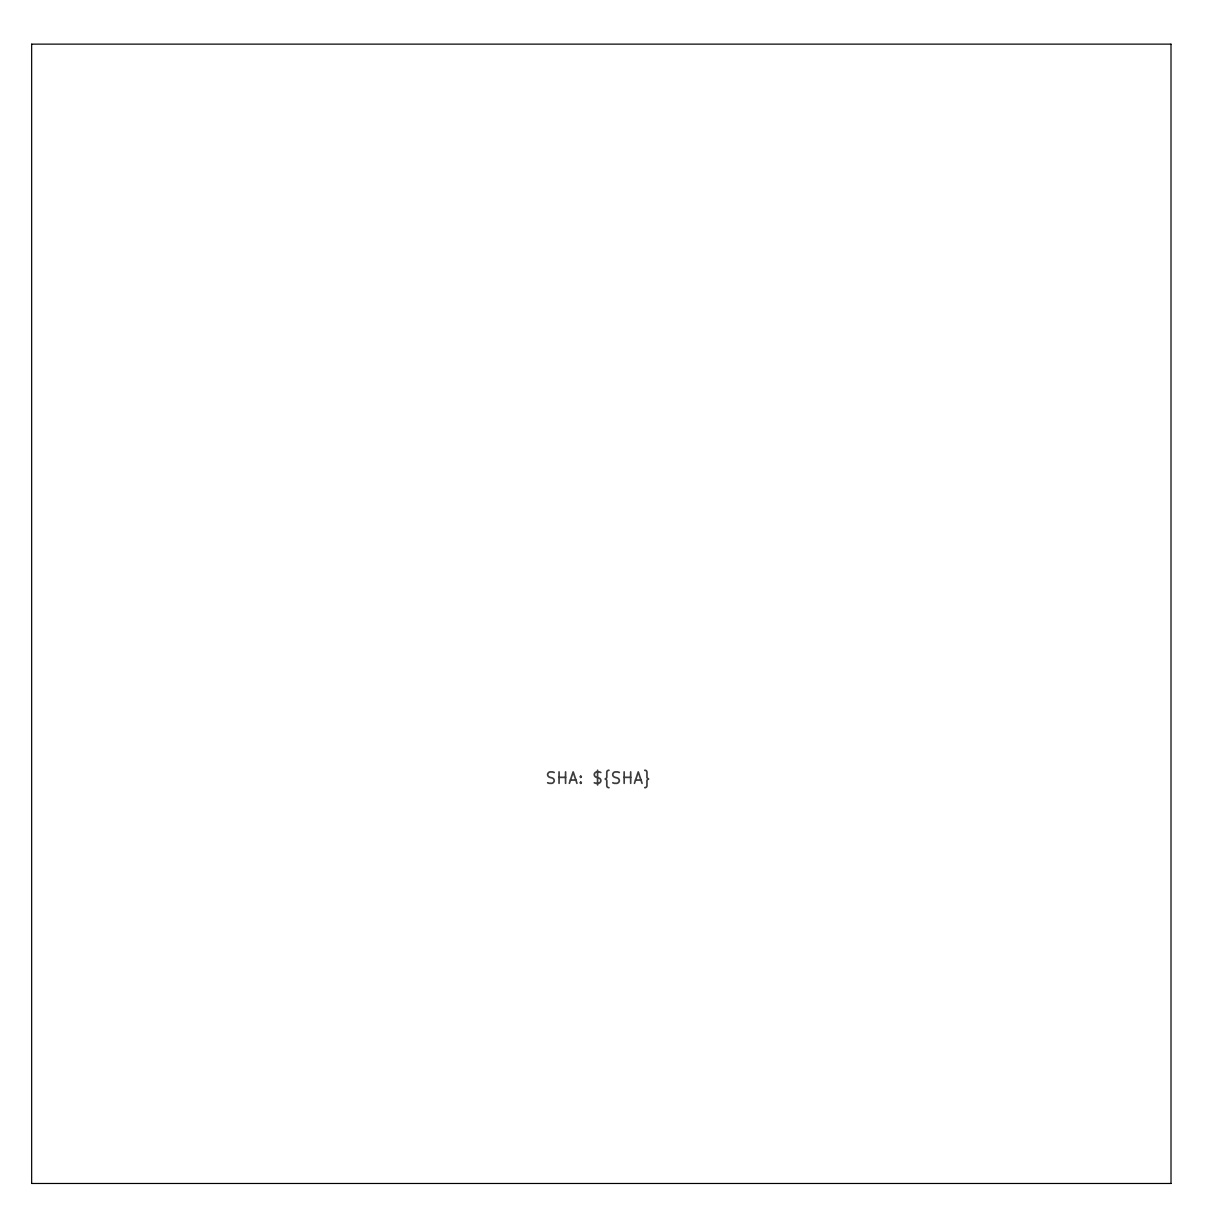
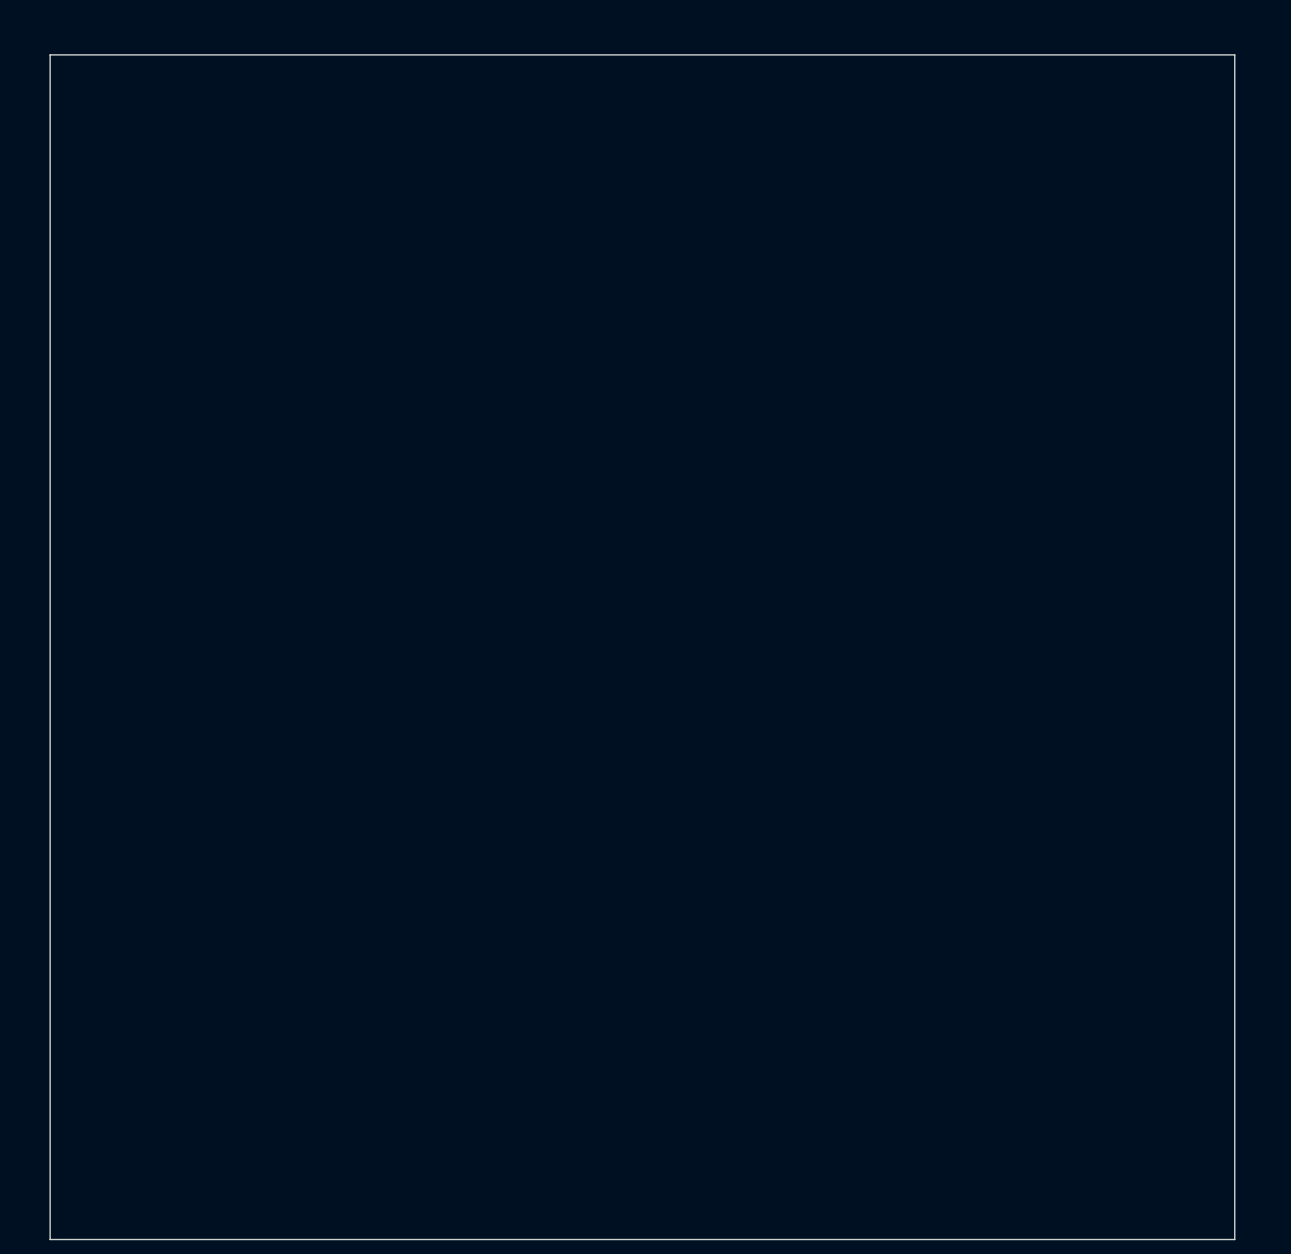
text: SHA: ${SHA} (598, 778) -> none

